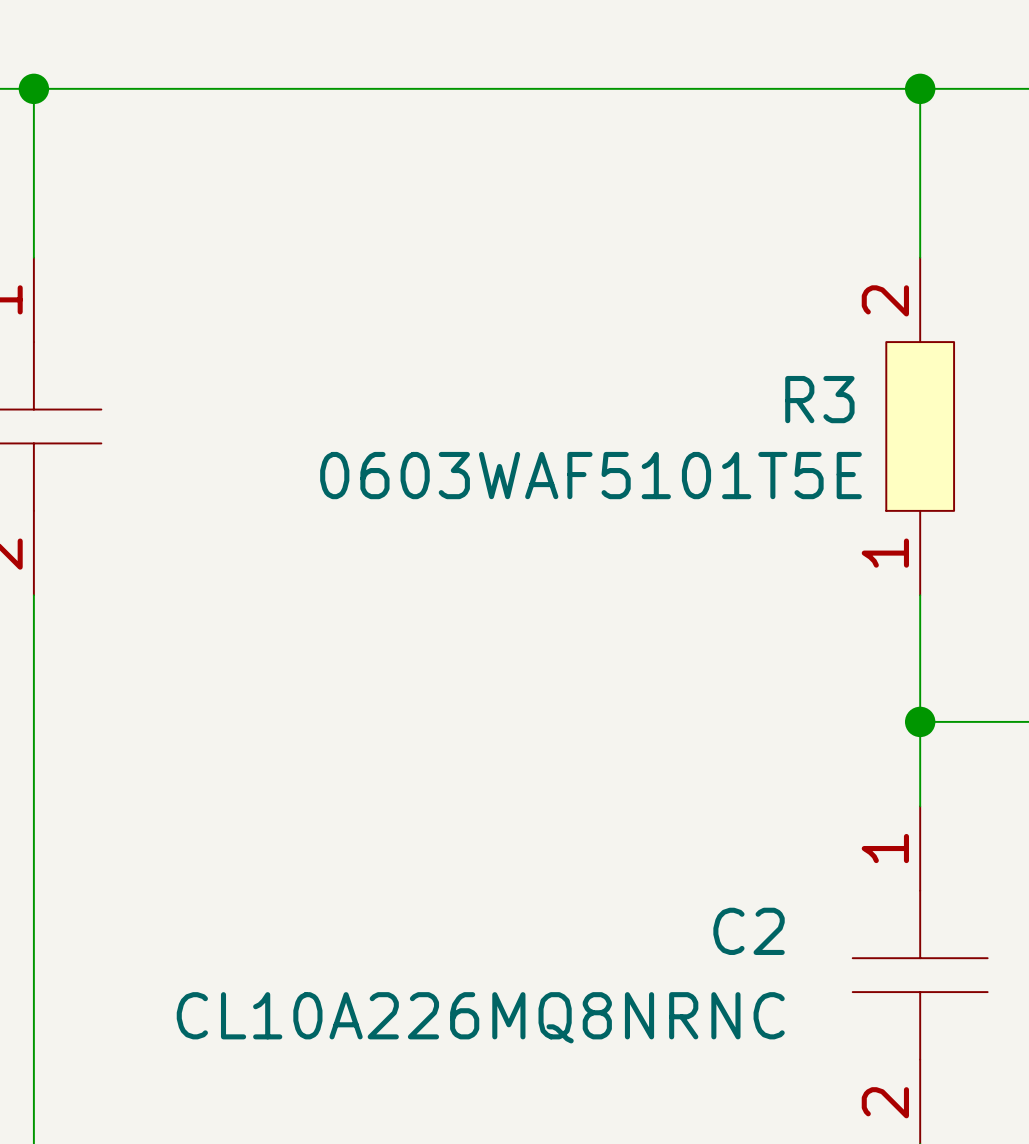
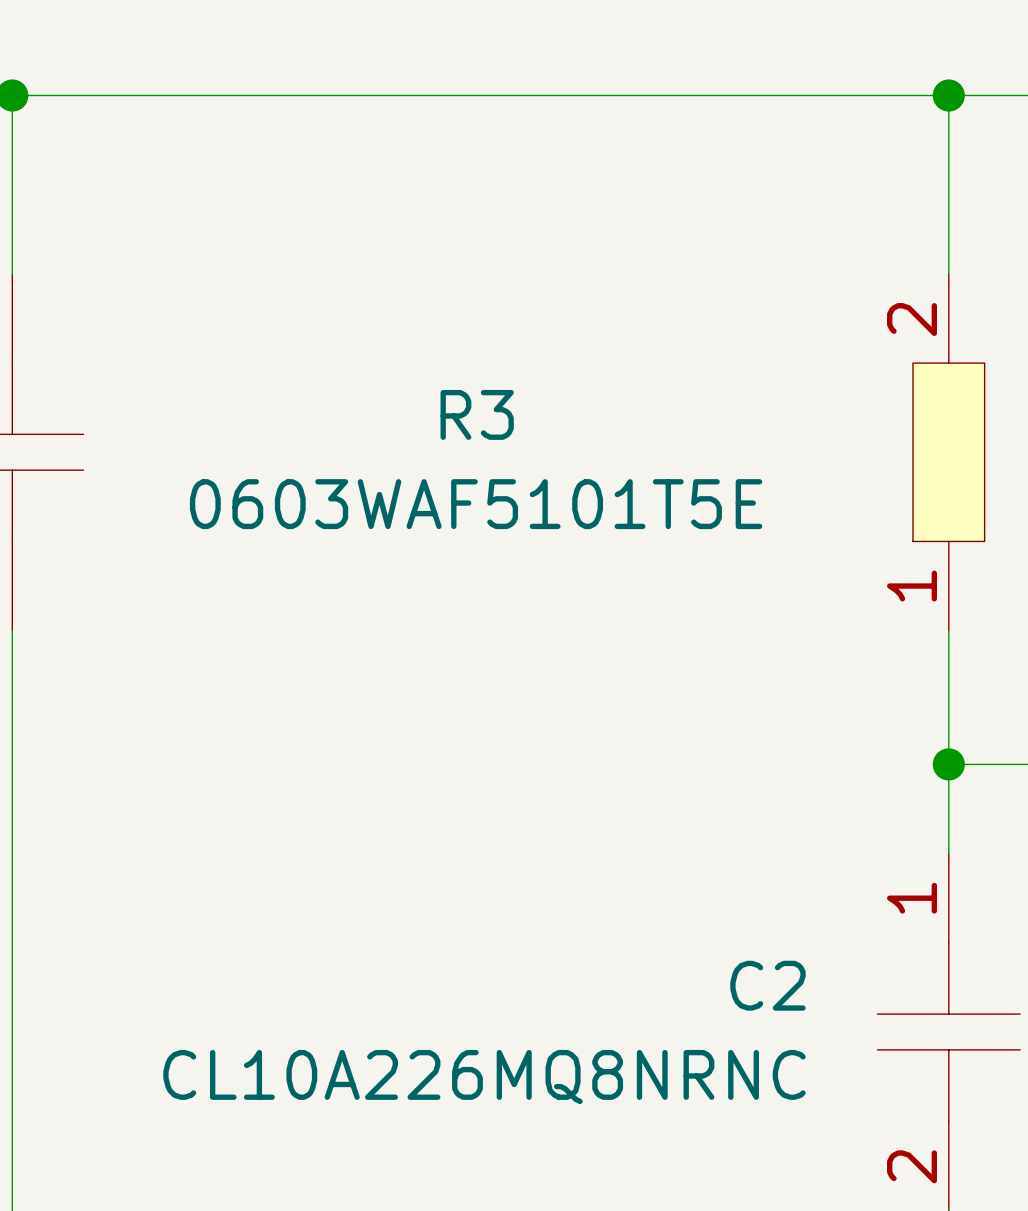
R3 name position: R3 (819, 399) -> R3 (477, 414)
R3 value position: 0603WAF5101T5E (590, 475) -> 0603WAF5101T5E (476, 504)

